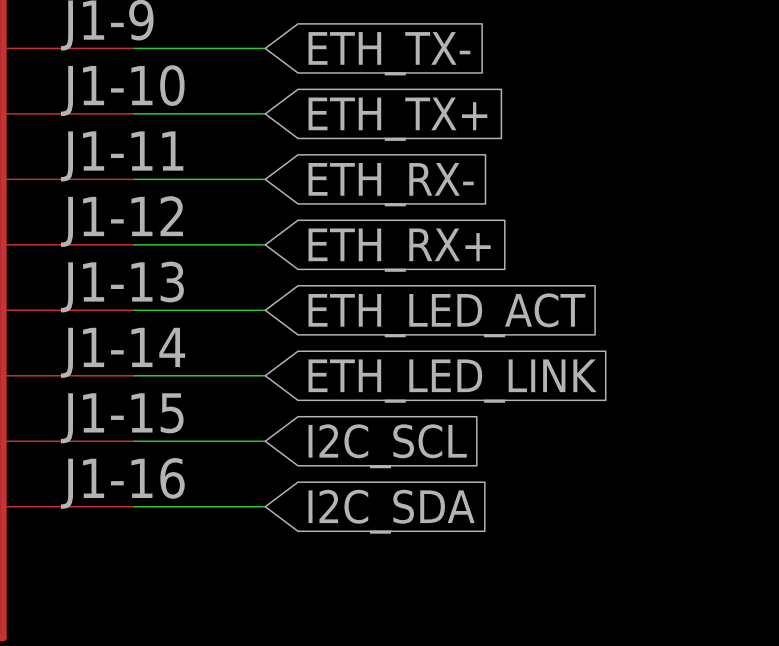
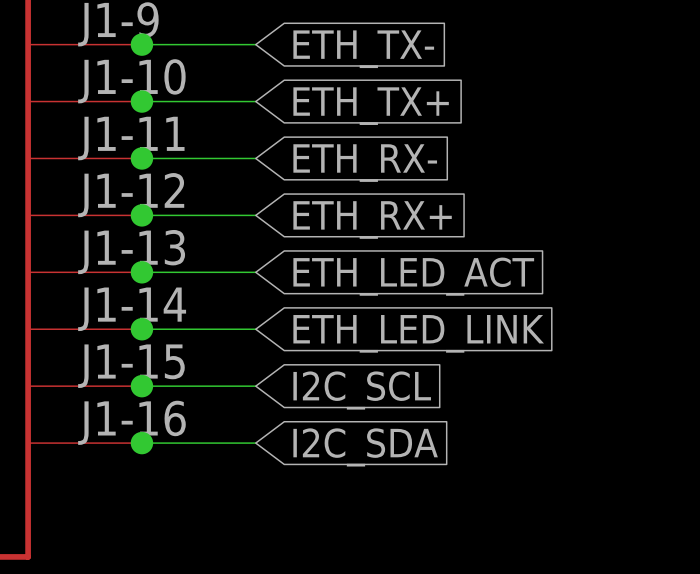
junction: none -> (141, 44)
junction: none -> (141, 101)
junction: none -> (141, 158)
junction: none -> (141, 215)
junction: none -> (141, 272)
junction: none -> (141, 329)
junction: none -> (141, 386)
junction: none -> (141, 443)

